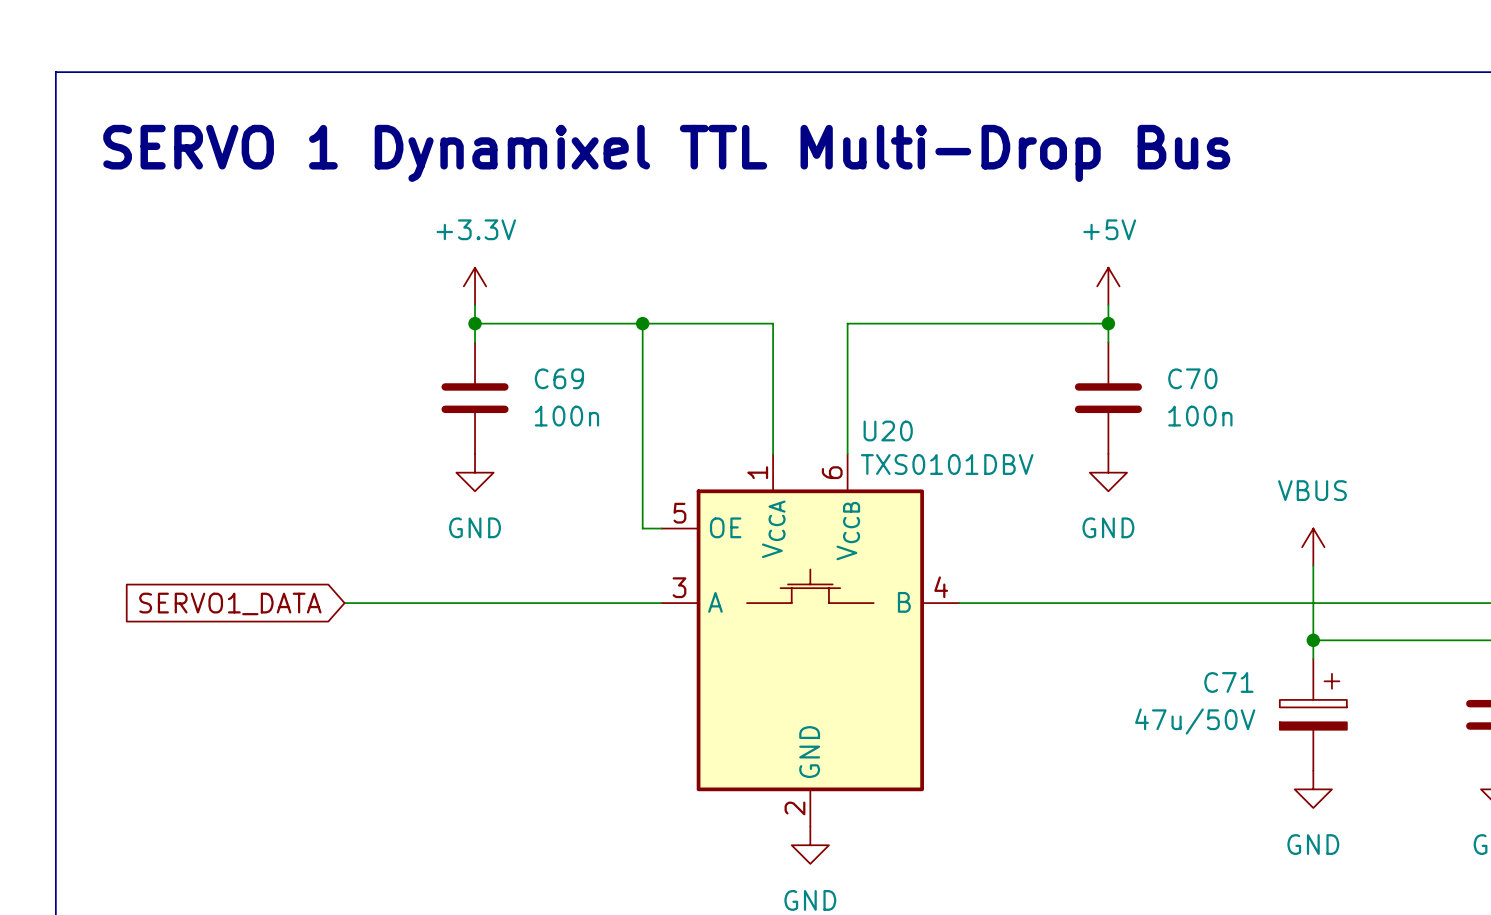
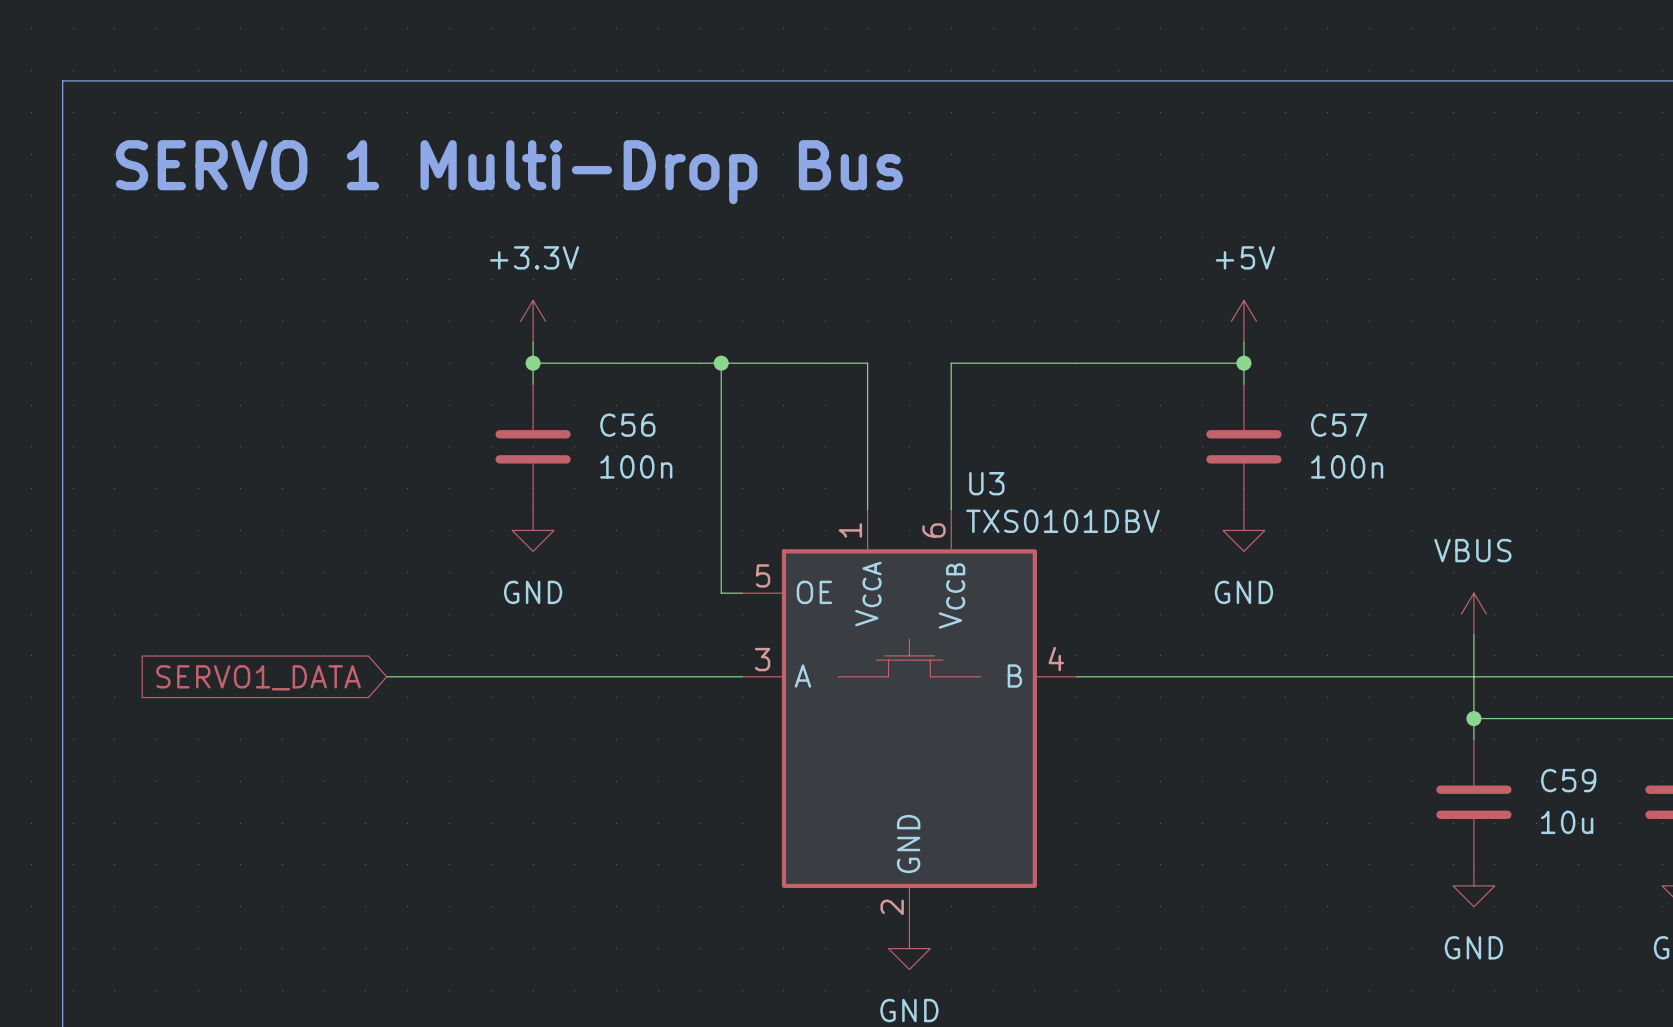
text: SERVO 1 Dynamixel TTL Multi-Drop Bus (666, 153) -> SERVO 1 Multi-Drop Bus (509, 172)
C69 name: C69 (559, 378) -> C56 (627, 425)
C70 name: C70 (1192, 378) -> C57 (1339, 425)
U20 name: U20 (888, 430) -> U3 (986, 483)
C71: 47u/50V (1313, 714) -> none
C59: none -> 10u (1473, 802)

